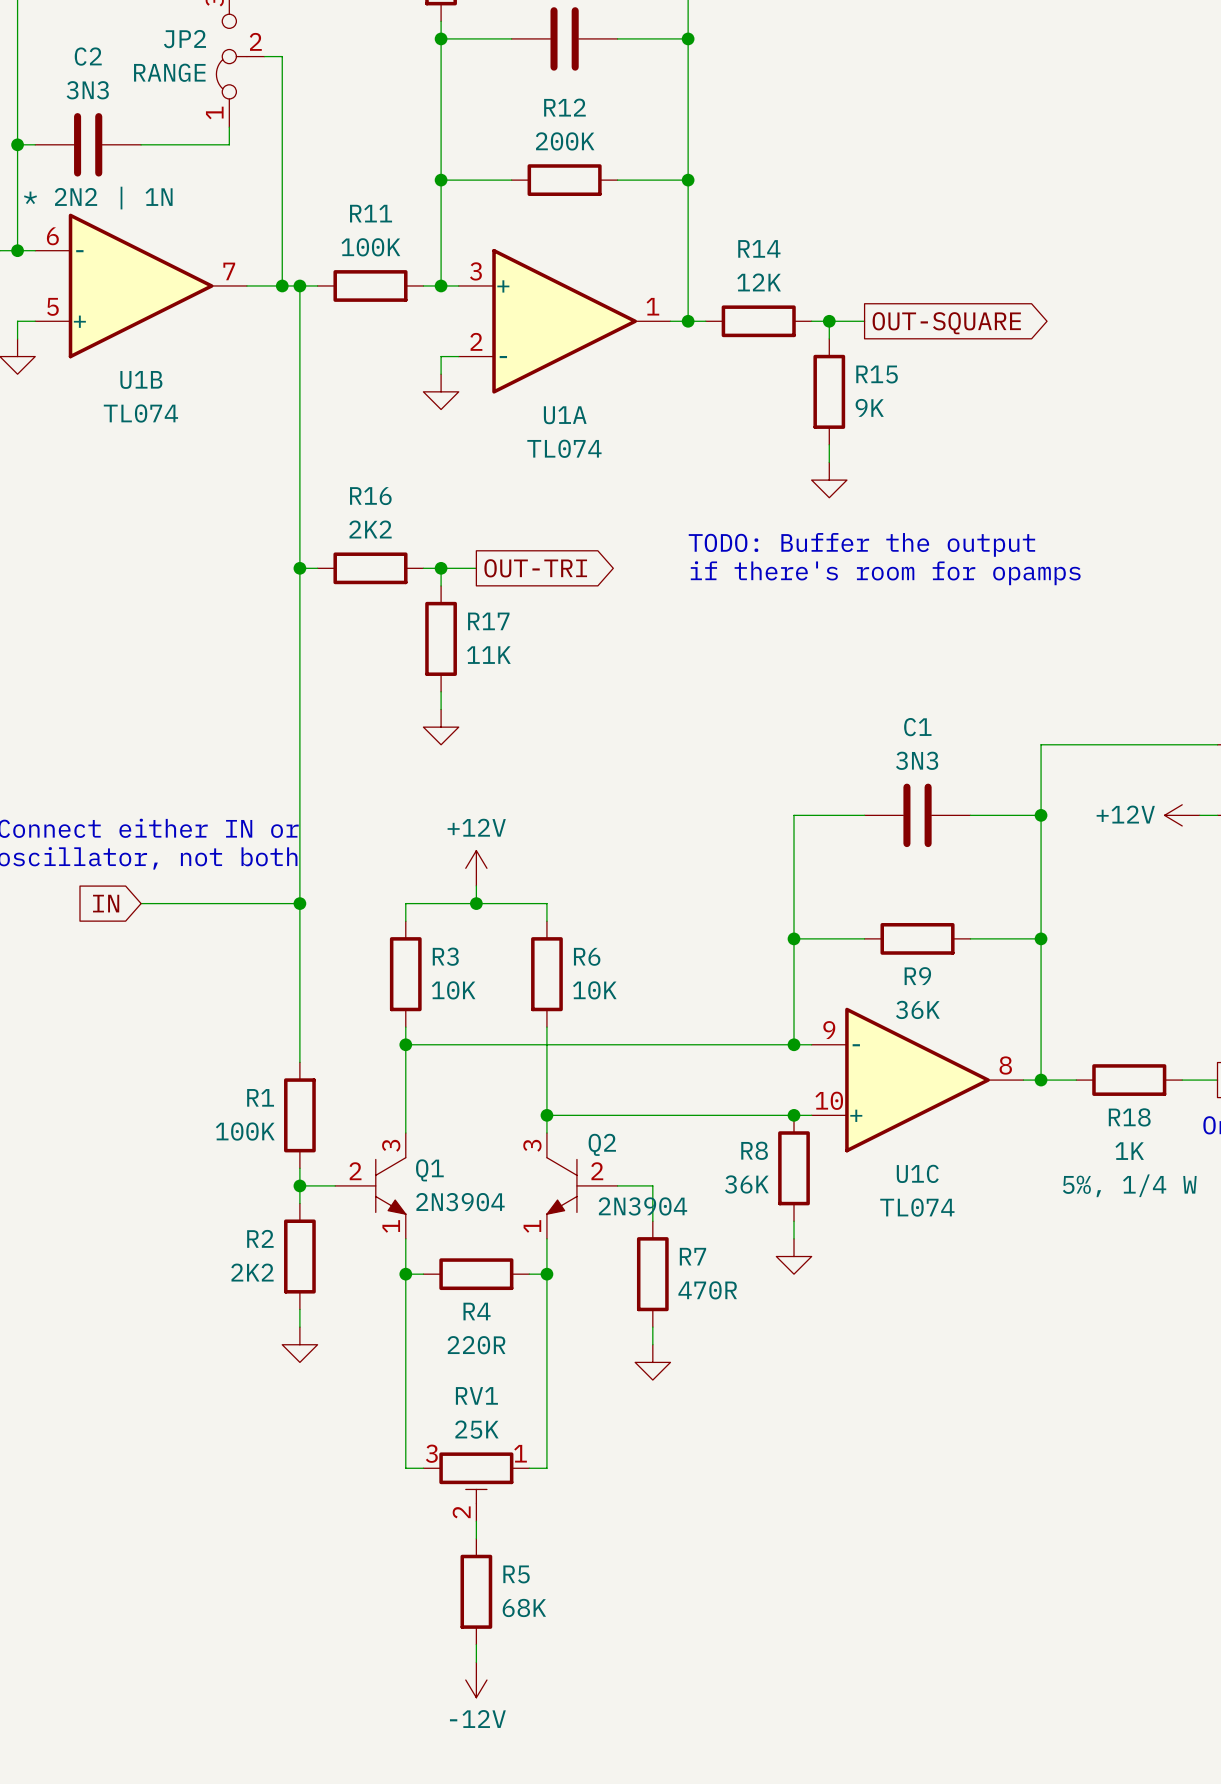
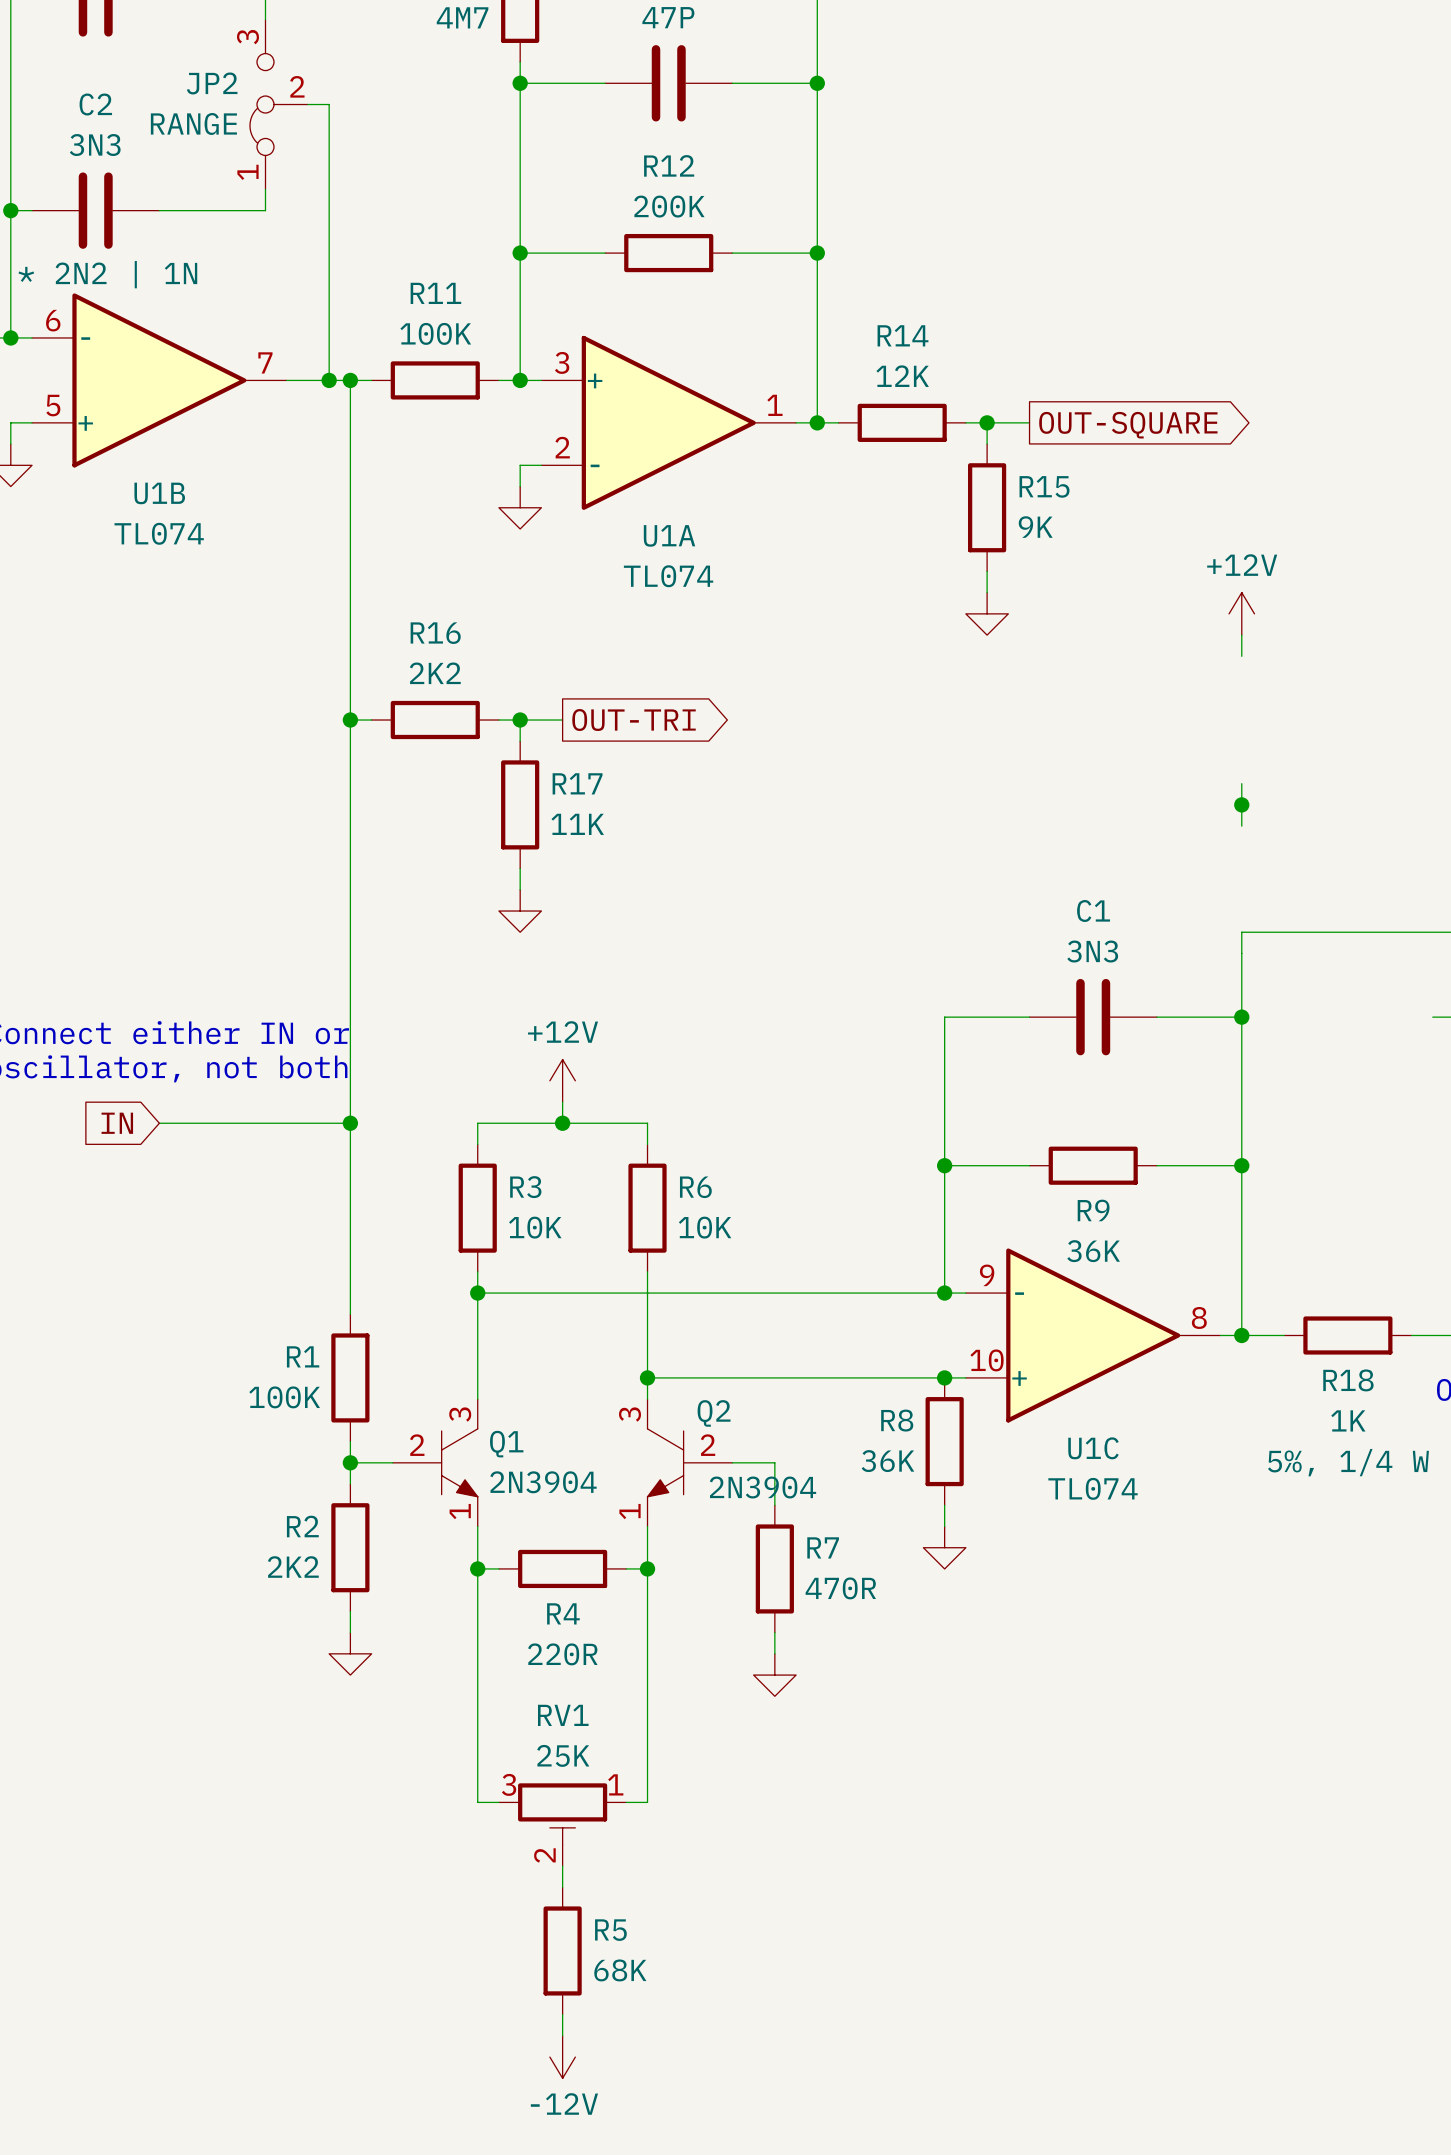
power symbol: none -> +12V (1241, 613)
wire: none -> (1241, 635) (1241, 656)
text: TODO: Buffer the output (861, 544) -> none
text: if there's room for opamps (885, 573) -> none
wire: none -> (1241, 783) (1241, 826)
junction: none -> (1241, 804)
power symbol: +12V (1182, 815) -> none

